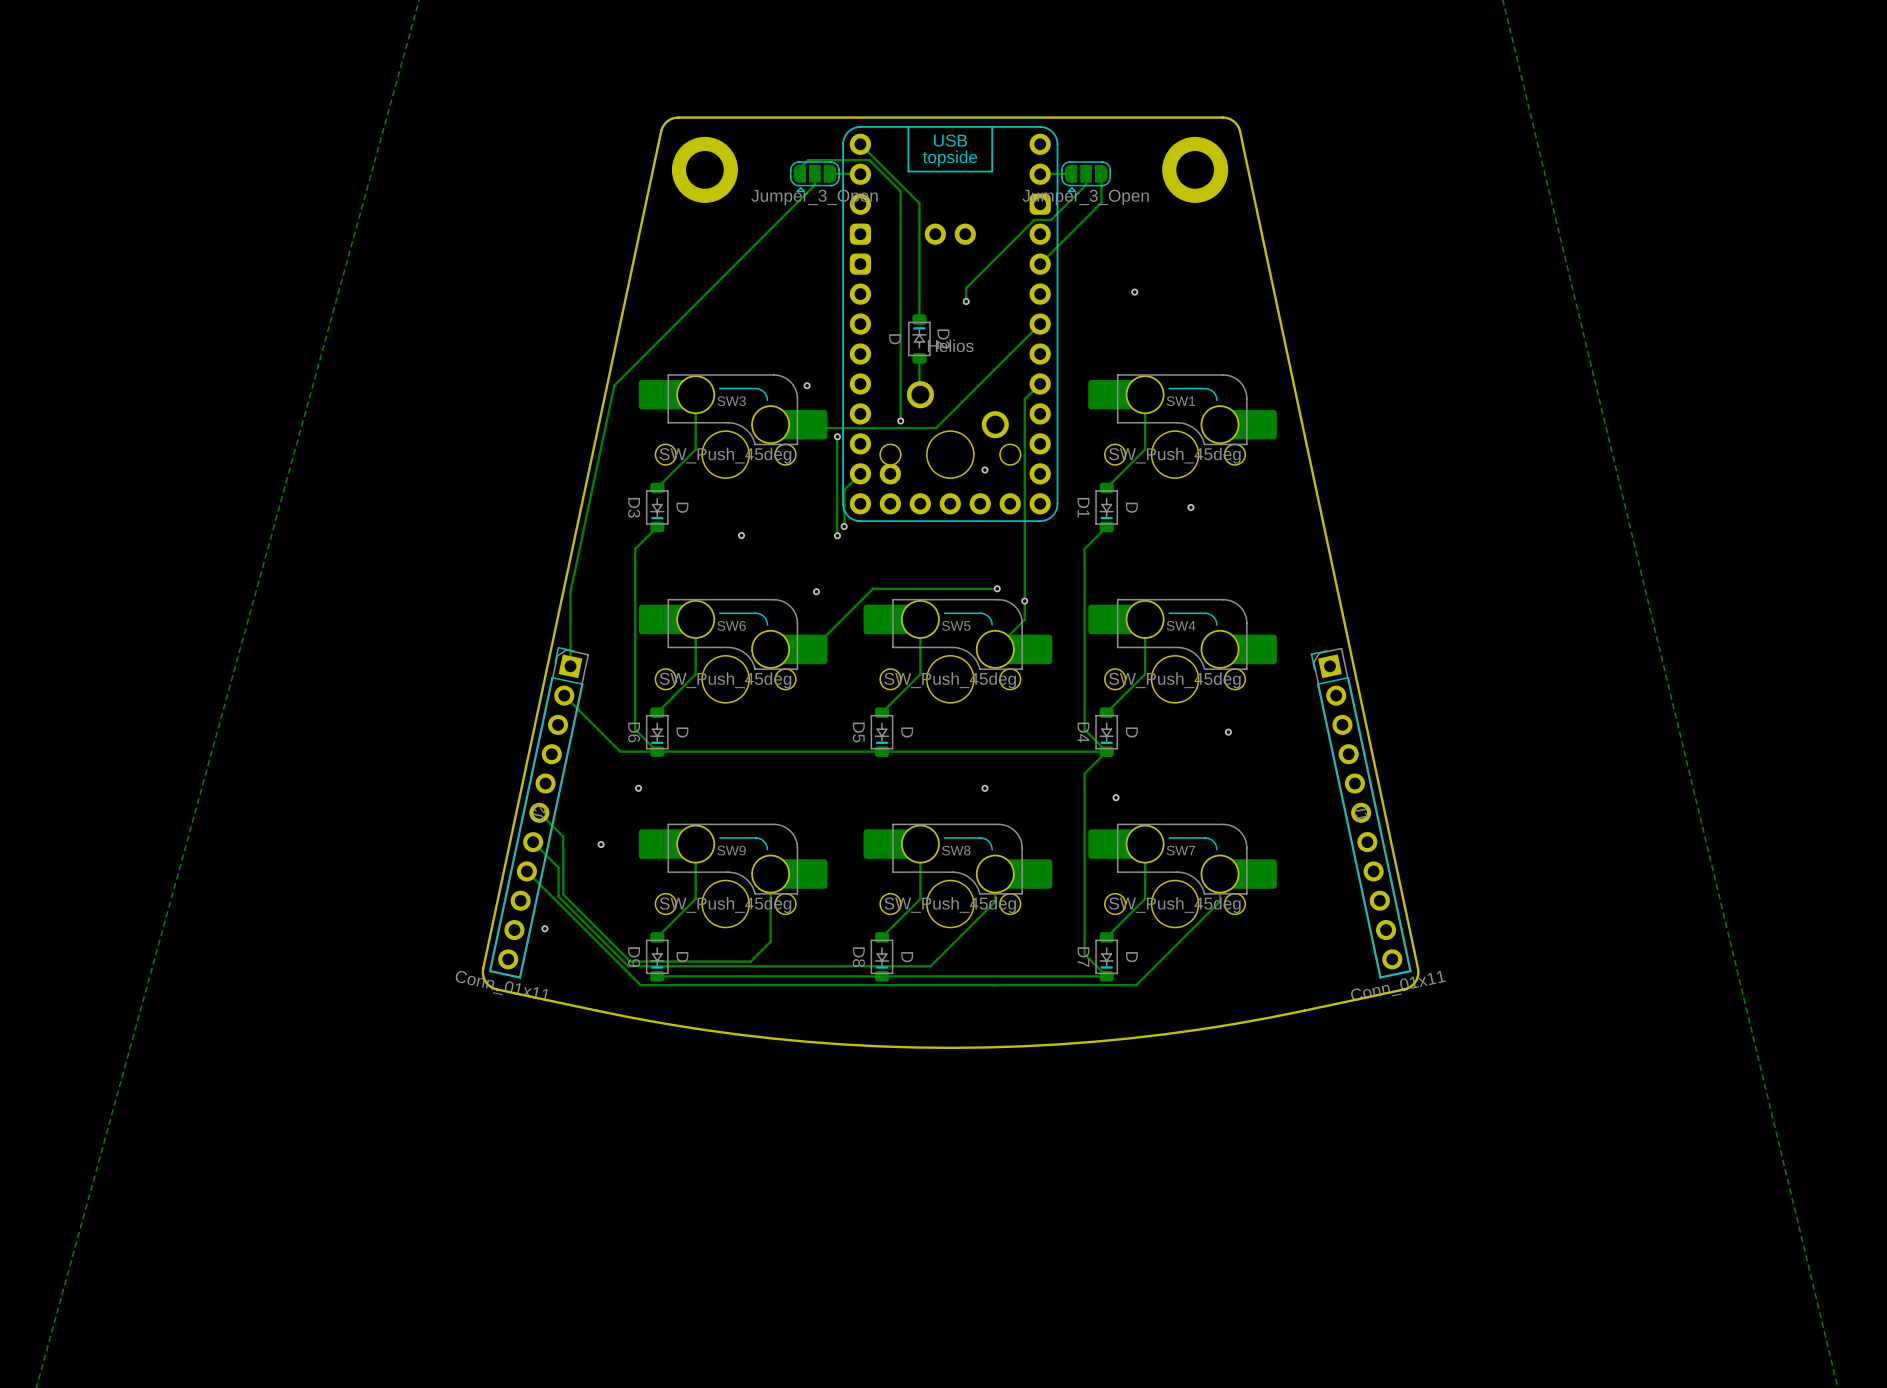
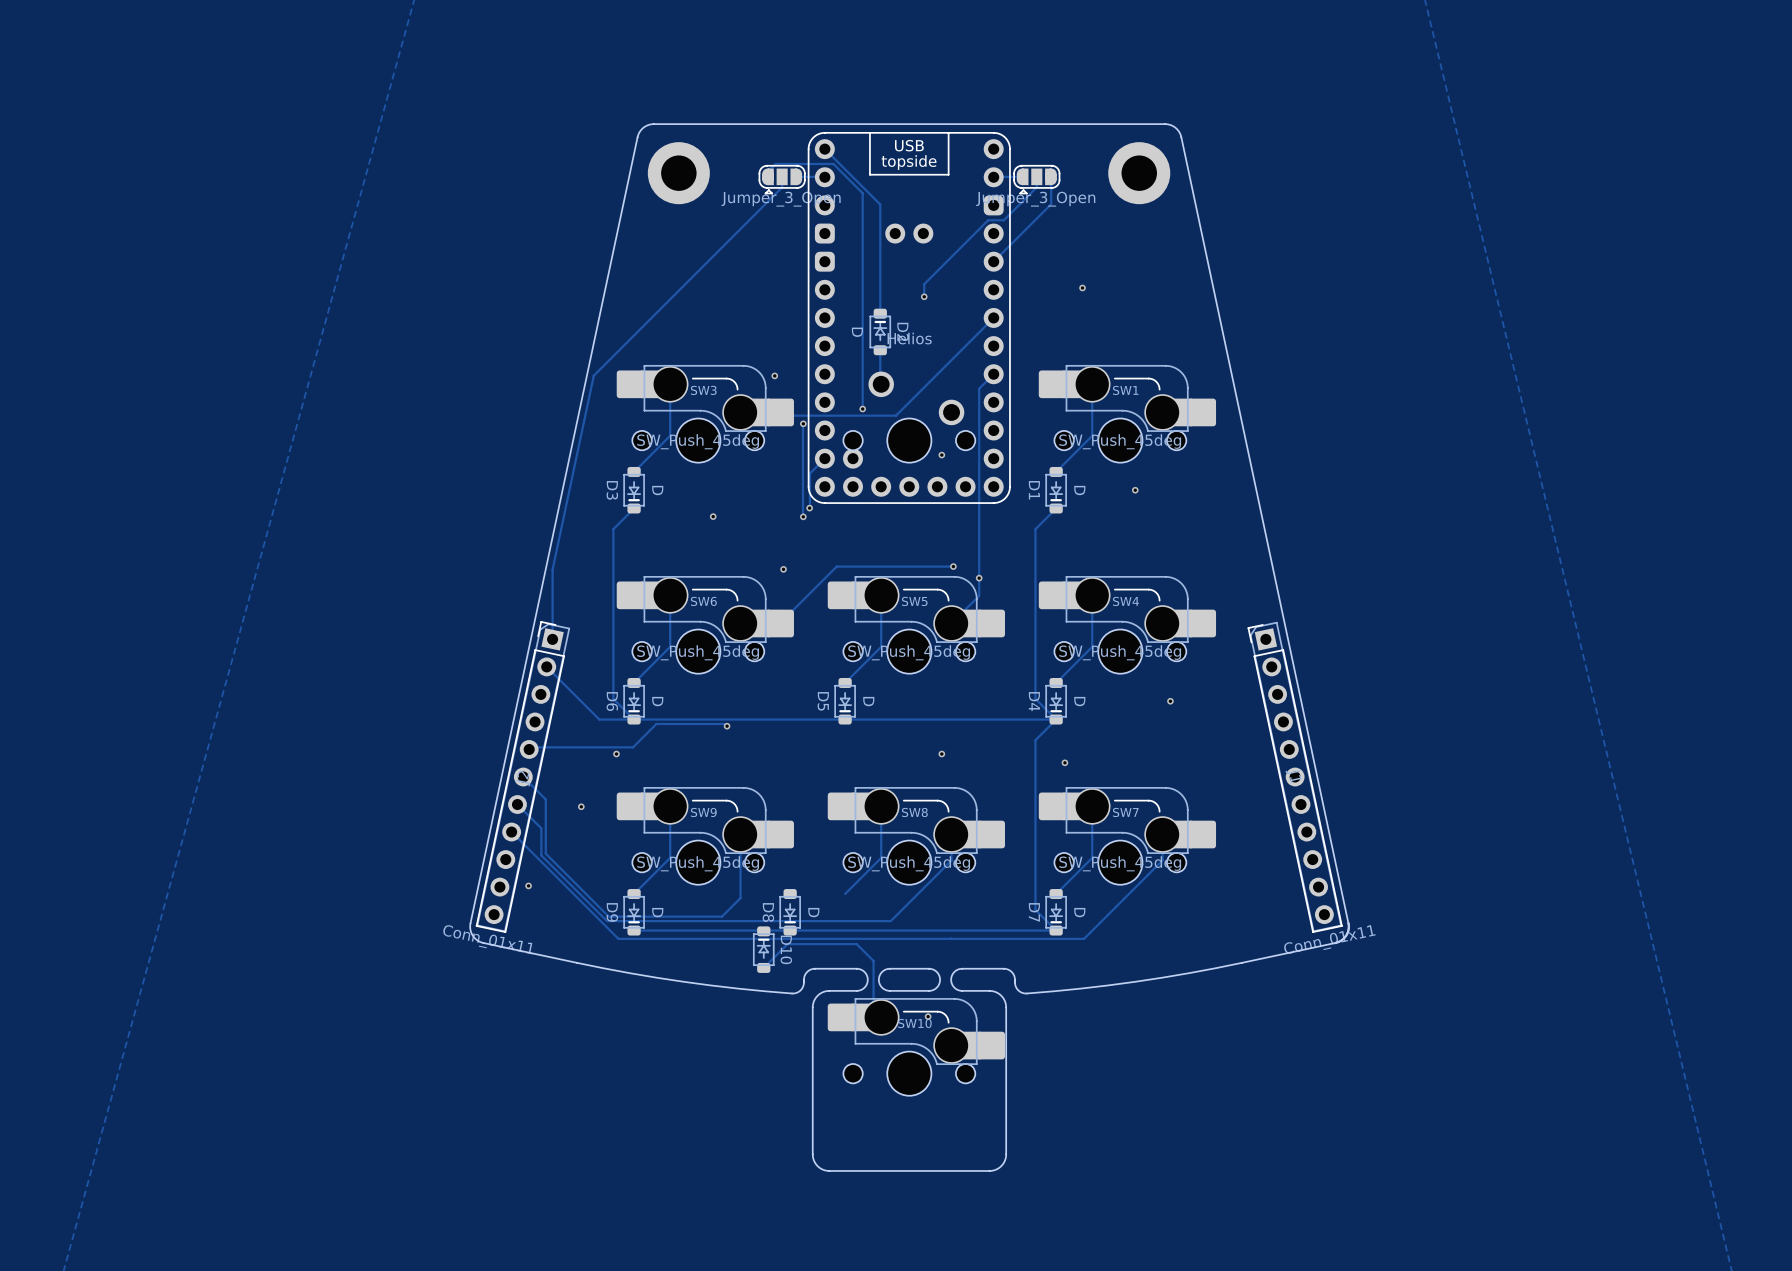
board edge: none -> (1165, 124) (653, 124) (643, 127) (638, 135) (470, 928) (475, 938) (483, 942) (630, 973) (737, 988) (794, 993) (802, 988) (805, 974) (812, 969) (856, 968) (863, 970) (867, 979) (863, 988) (858, 990) (823, 991) (817, 995) (813, 1003) (812, 1156) (817, 1166) (825, 1170) (989, 1170) (996, 1169) (1003, 1163) (1006, 1154) (1005, 1003) (1002, 997) (995, 991) (960, 990) (955, 988) (951, 978) (957, 969) (1006, 969) (1013, 974) (1016, 987) (1021, 992) (1053, 991) (1134, 981) (1215, 968) (1335, 942) (1343, 939) (1347, 931) (1348, 923) (1181, 137) (1175, 127) (1165, 124)
track: none -> (727, 726) (724, 723) (656, 723) (633, 747) (531, 747) (529, 749)
via: none -> (727, 726)
D8 position: (881, 956) -> (790, 912)
board edge: (1417, 968) (1240, 131) (1235, 122) (1222, 117) (678, 117) (667, 121) (661, 131) (483, 968) (483, 975) (487, 983) (496, 989) (631, 1017) (702, 1029) (843, 1044) (950, 1047) (1057, 1044) (1163, 1034) (1269, 1017) (1404, 989) -> none
D10: none -> (763, 949)
track: none -> (763, 967) (787, 944) (856, 944) (873, 960) (873, 1009) (881, 1017)
board edge: none -> (928, 968) (887, 969) (880, 974) (879, 982) (882, 987) (888, 990) (931, 990) (937, 986) (939, 978) (936, 971) (928, 968)
via: none -> (928, 1016)
SW10: none -> (916, 1047)

